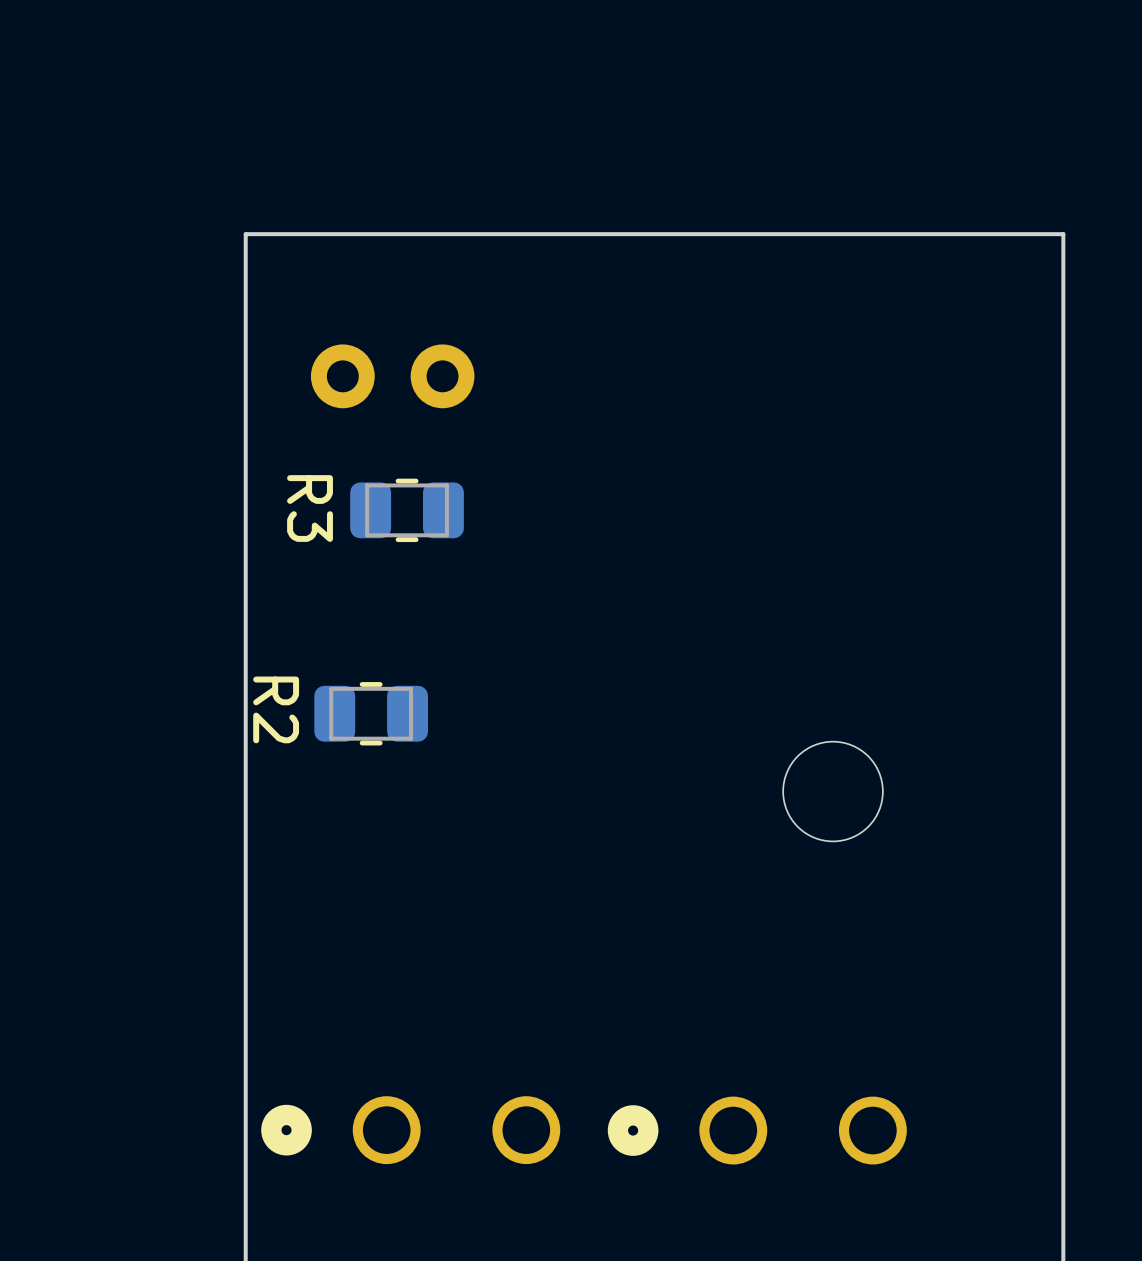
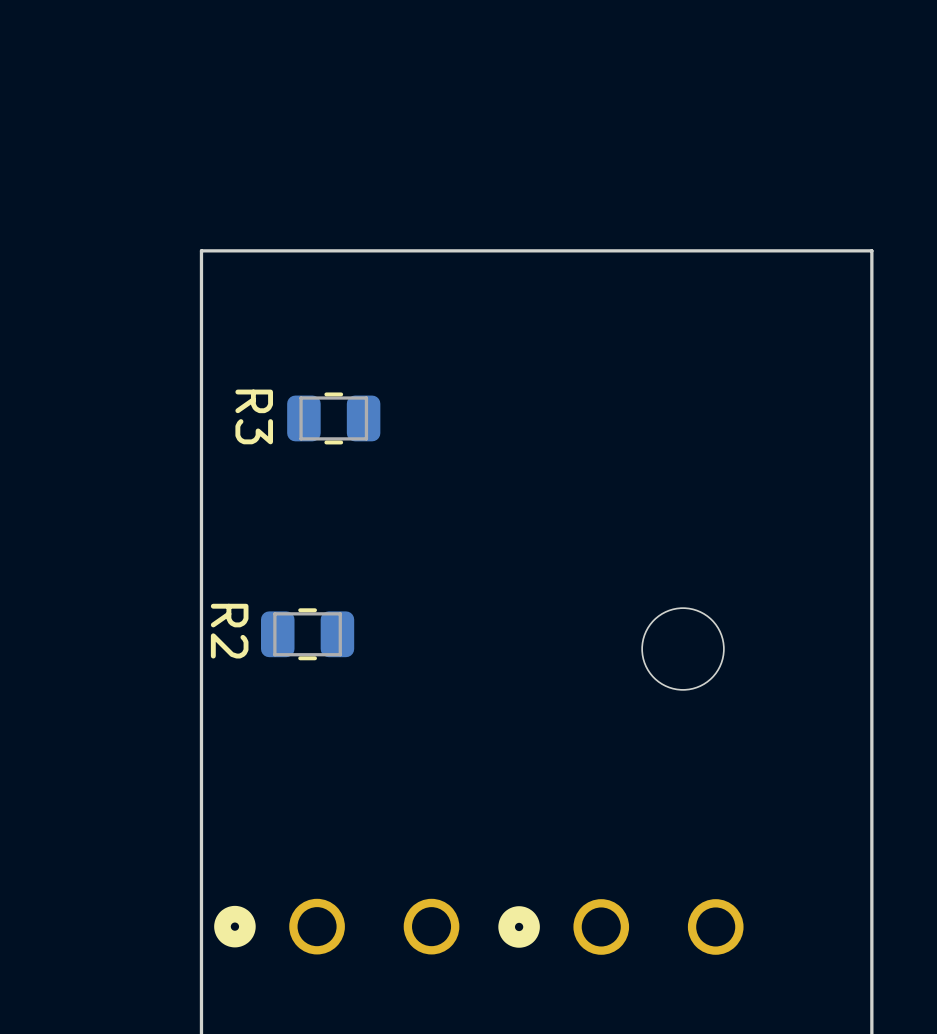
board edge: (1063, 305) (1063, 234) (245, 234) (245, 305) -> (871, 250) (201, 250)
part: (392, 376) -> none
R2 position: (371, 713) -> (307, 634)

